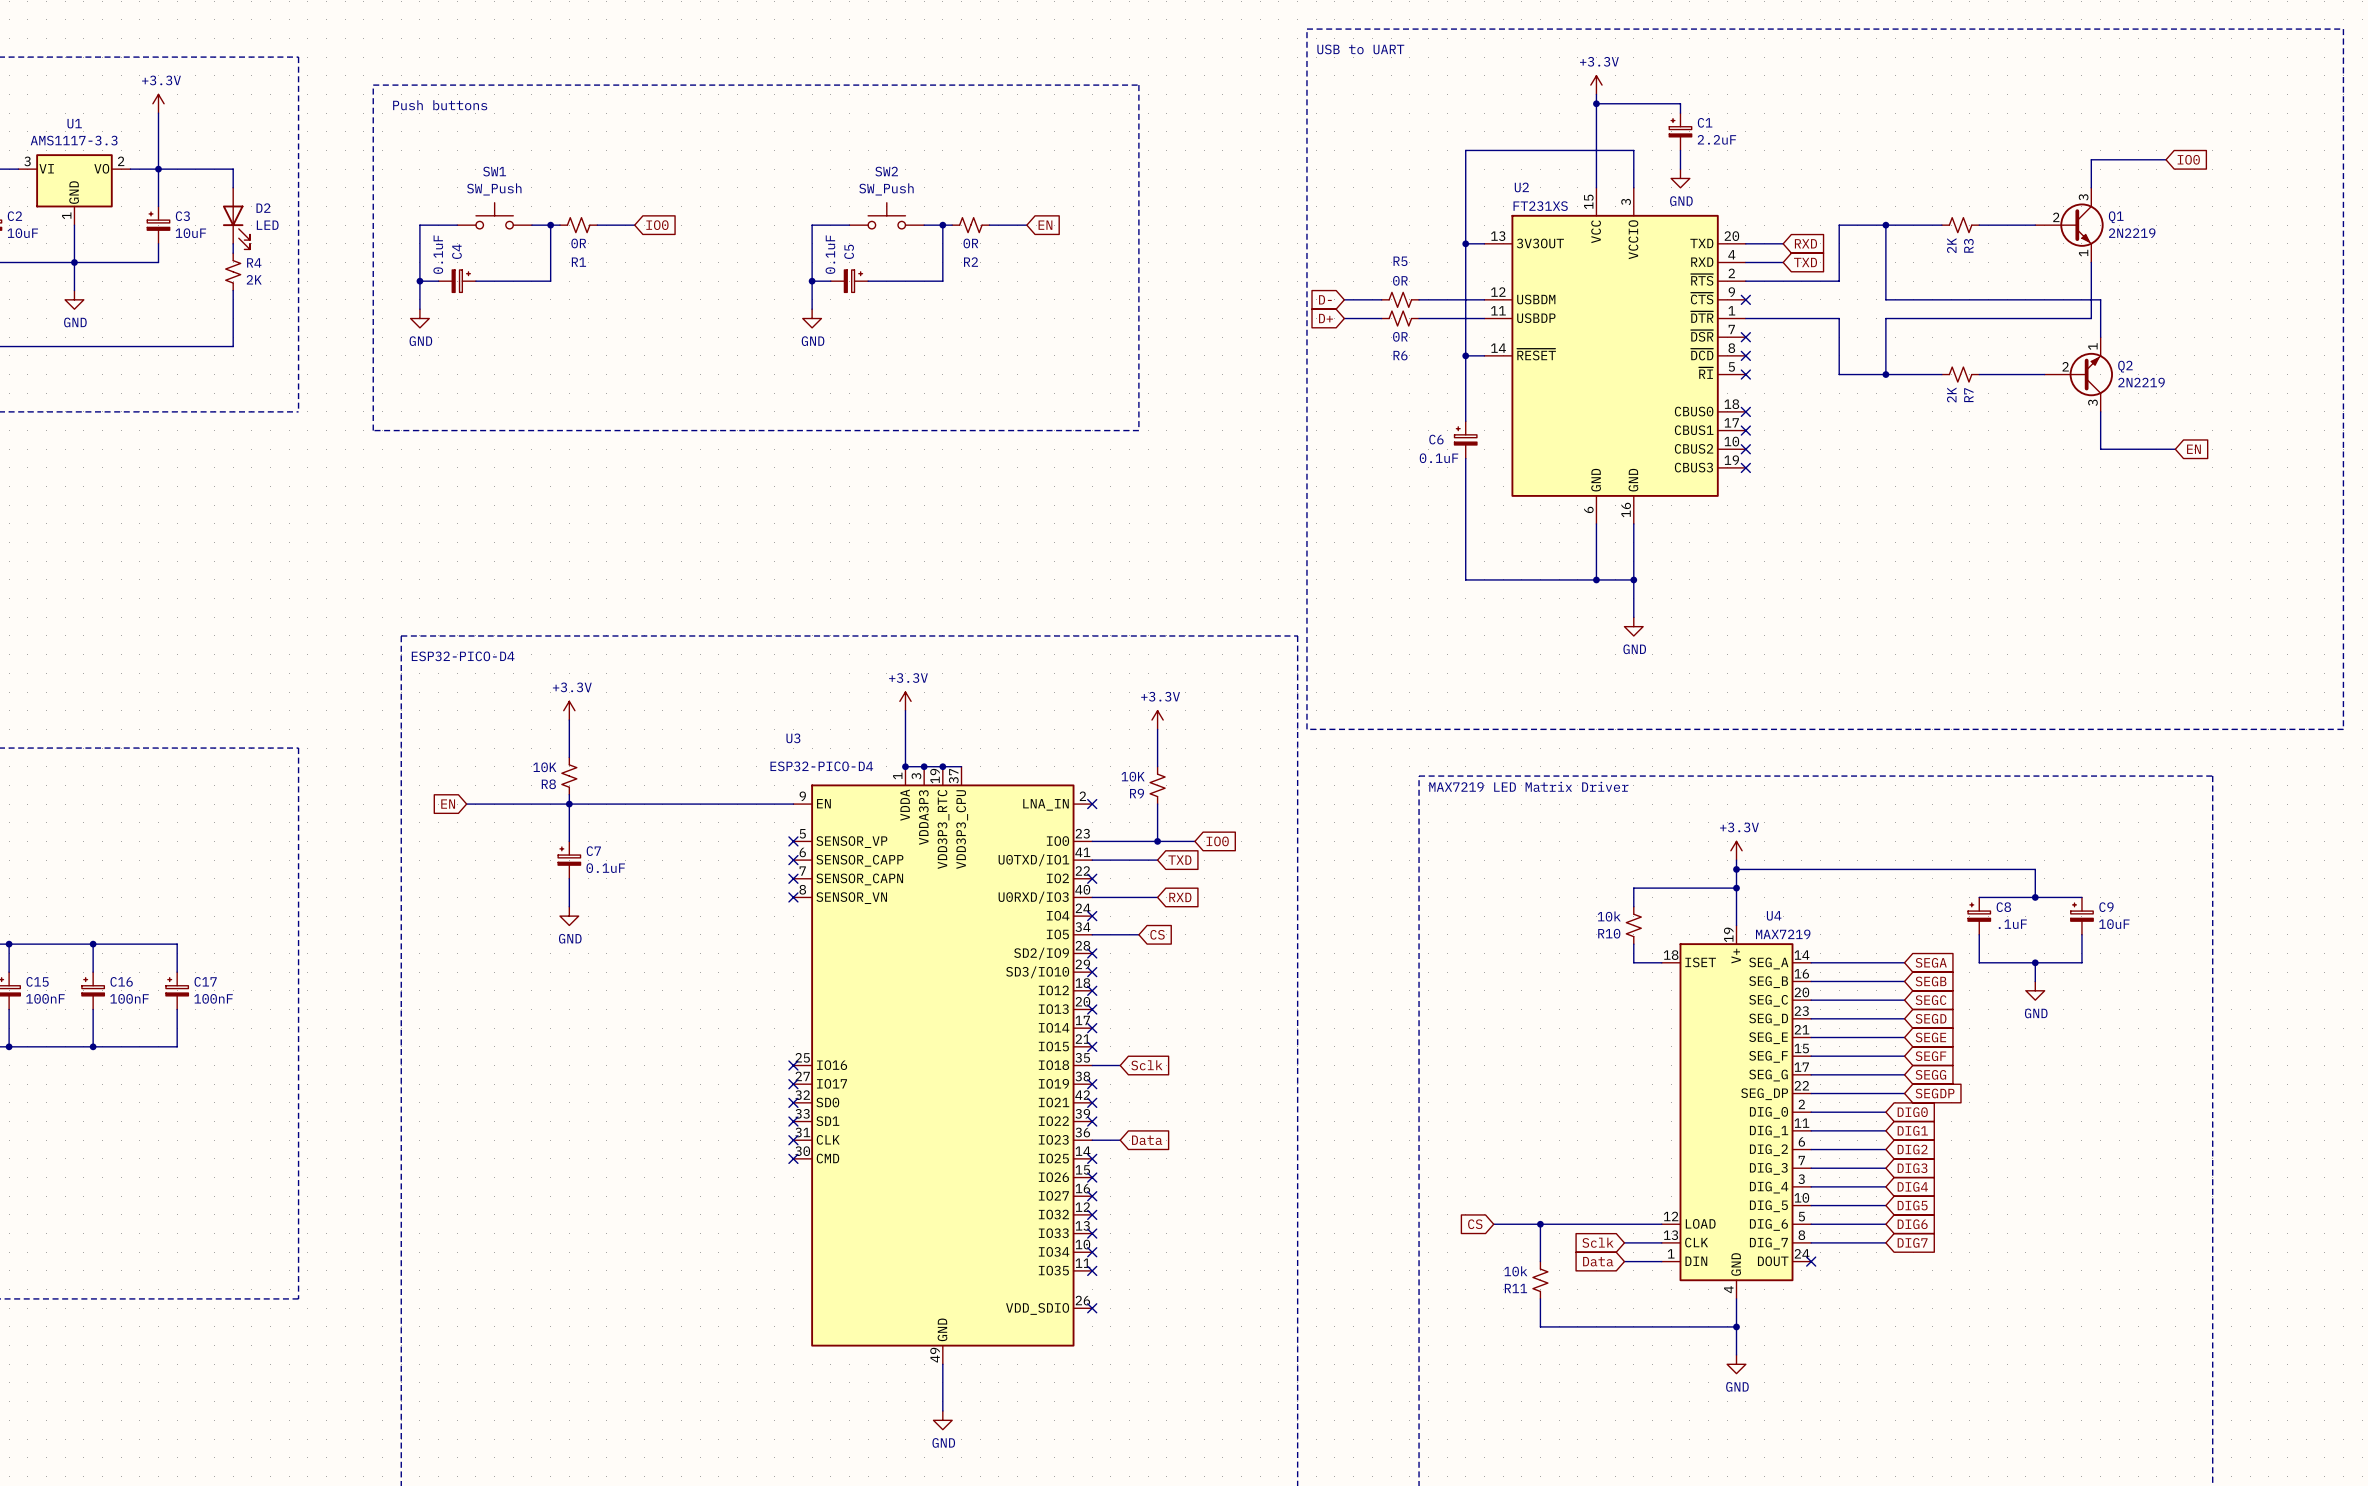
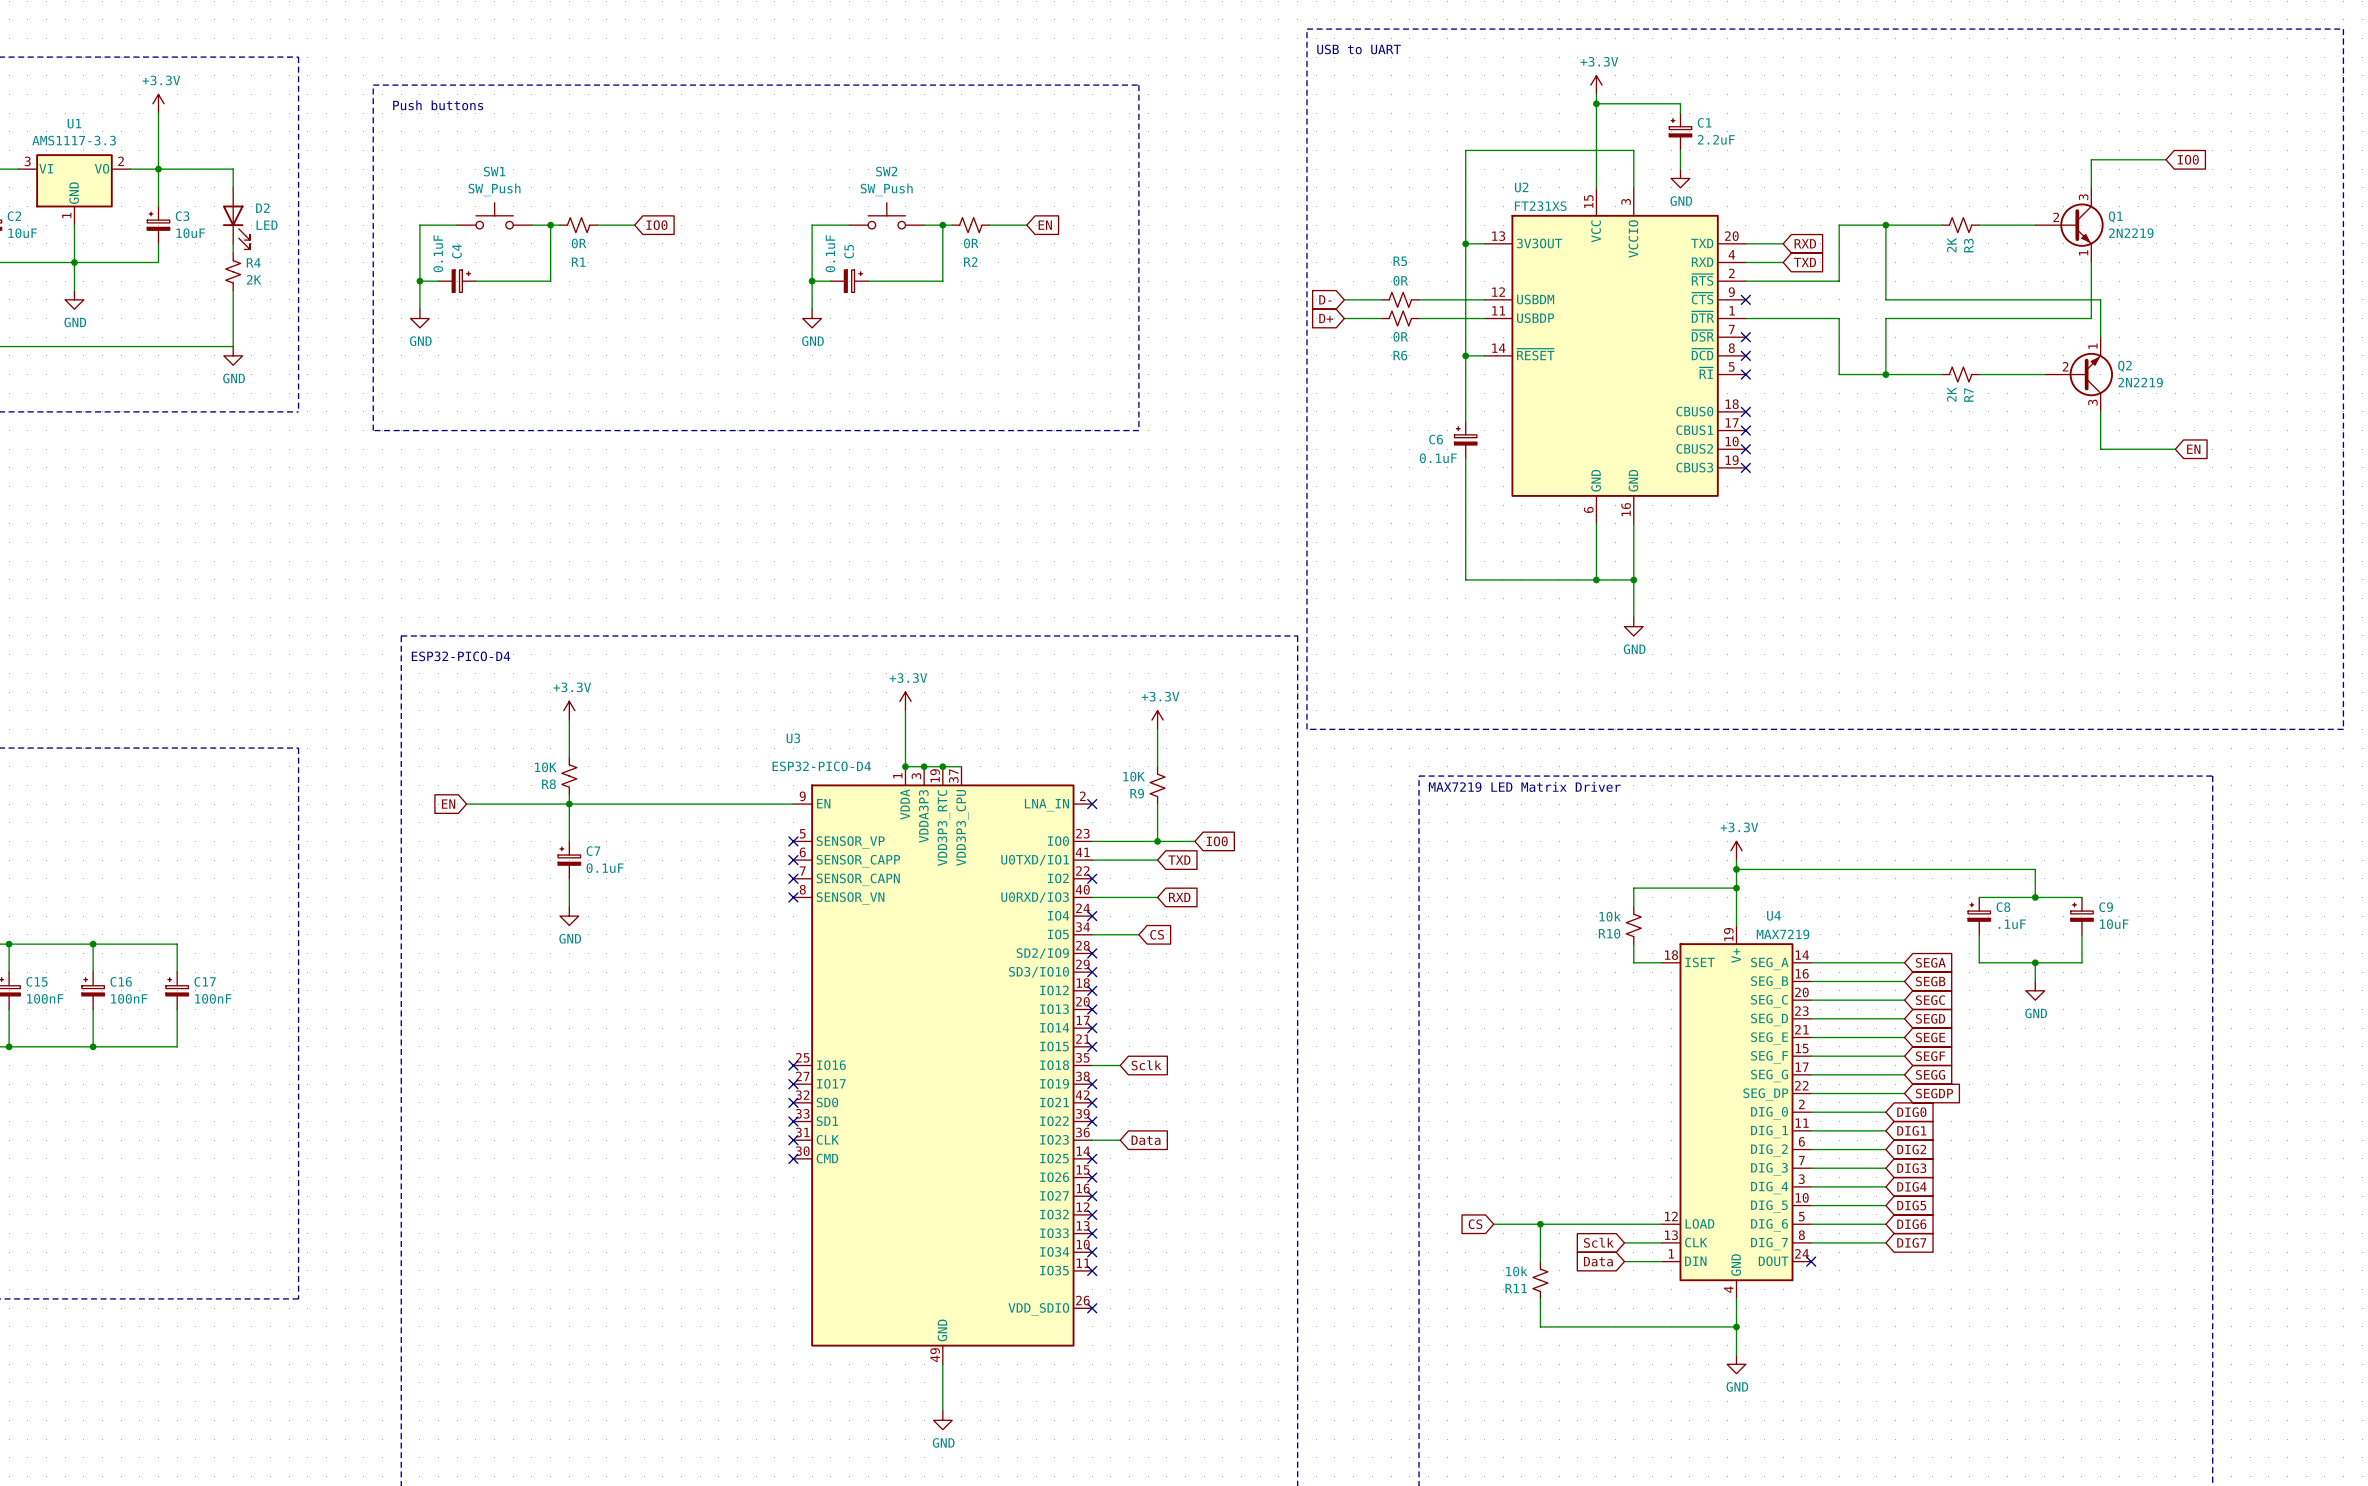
power symbol: none -> GND (233, 355)

